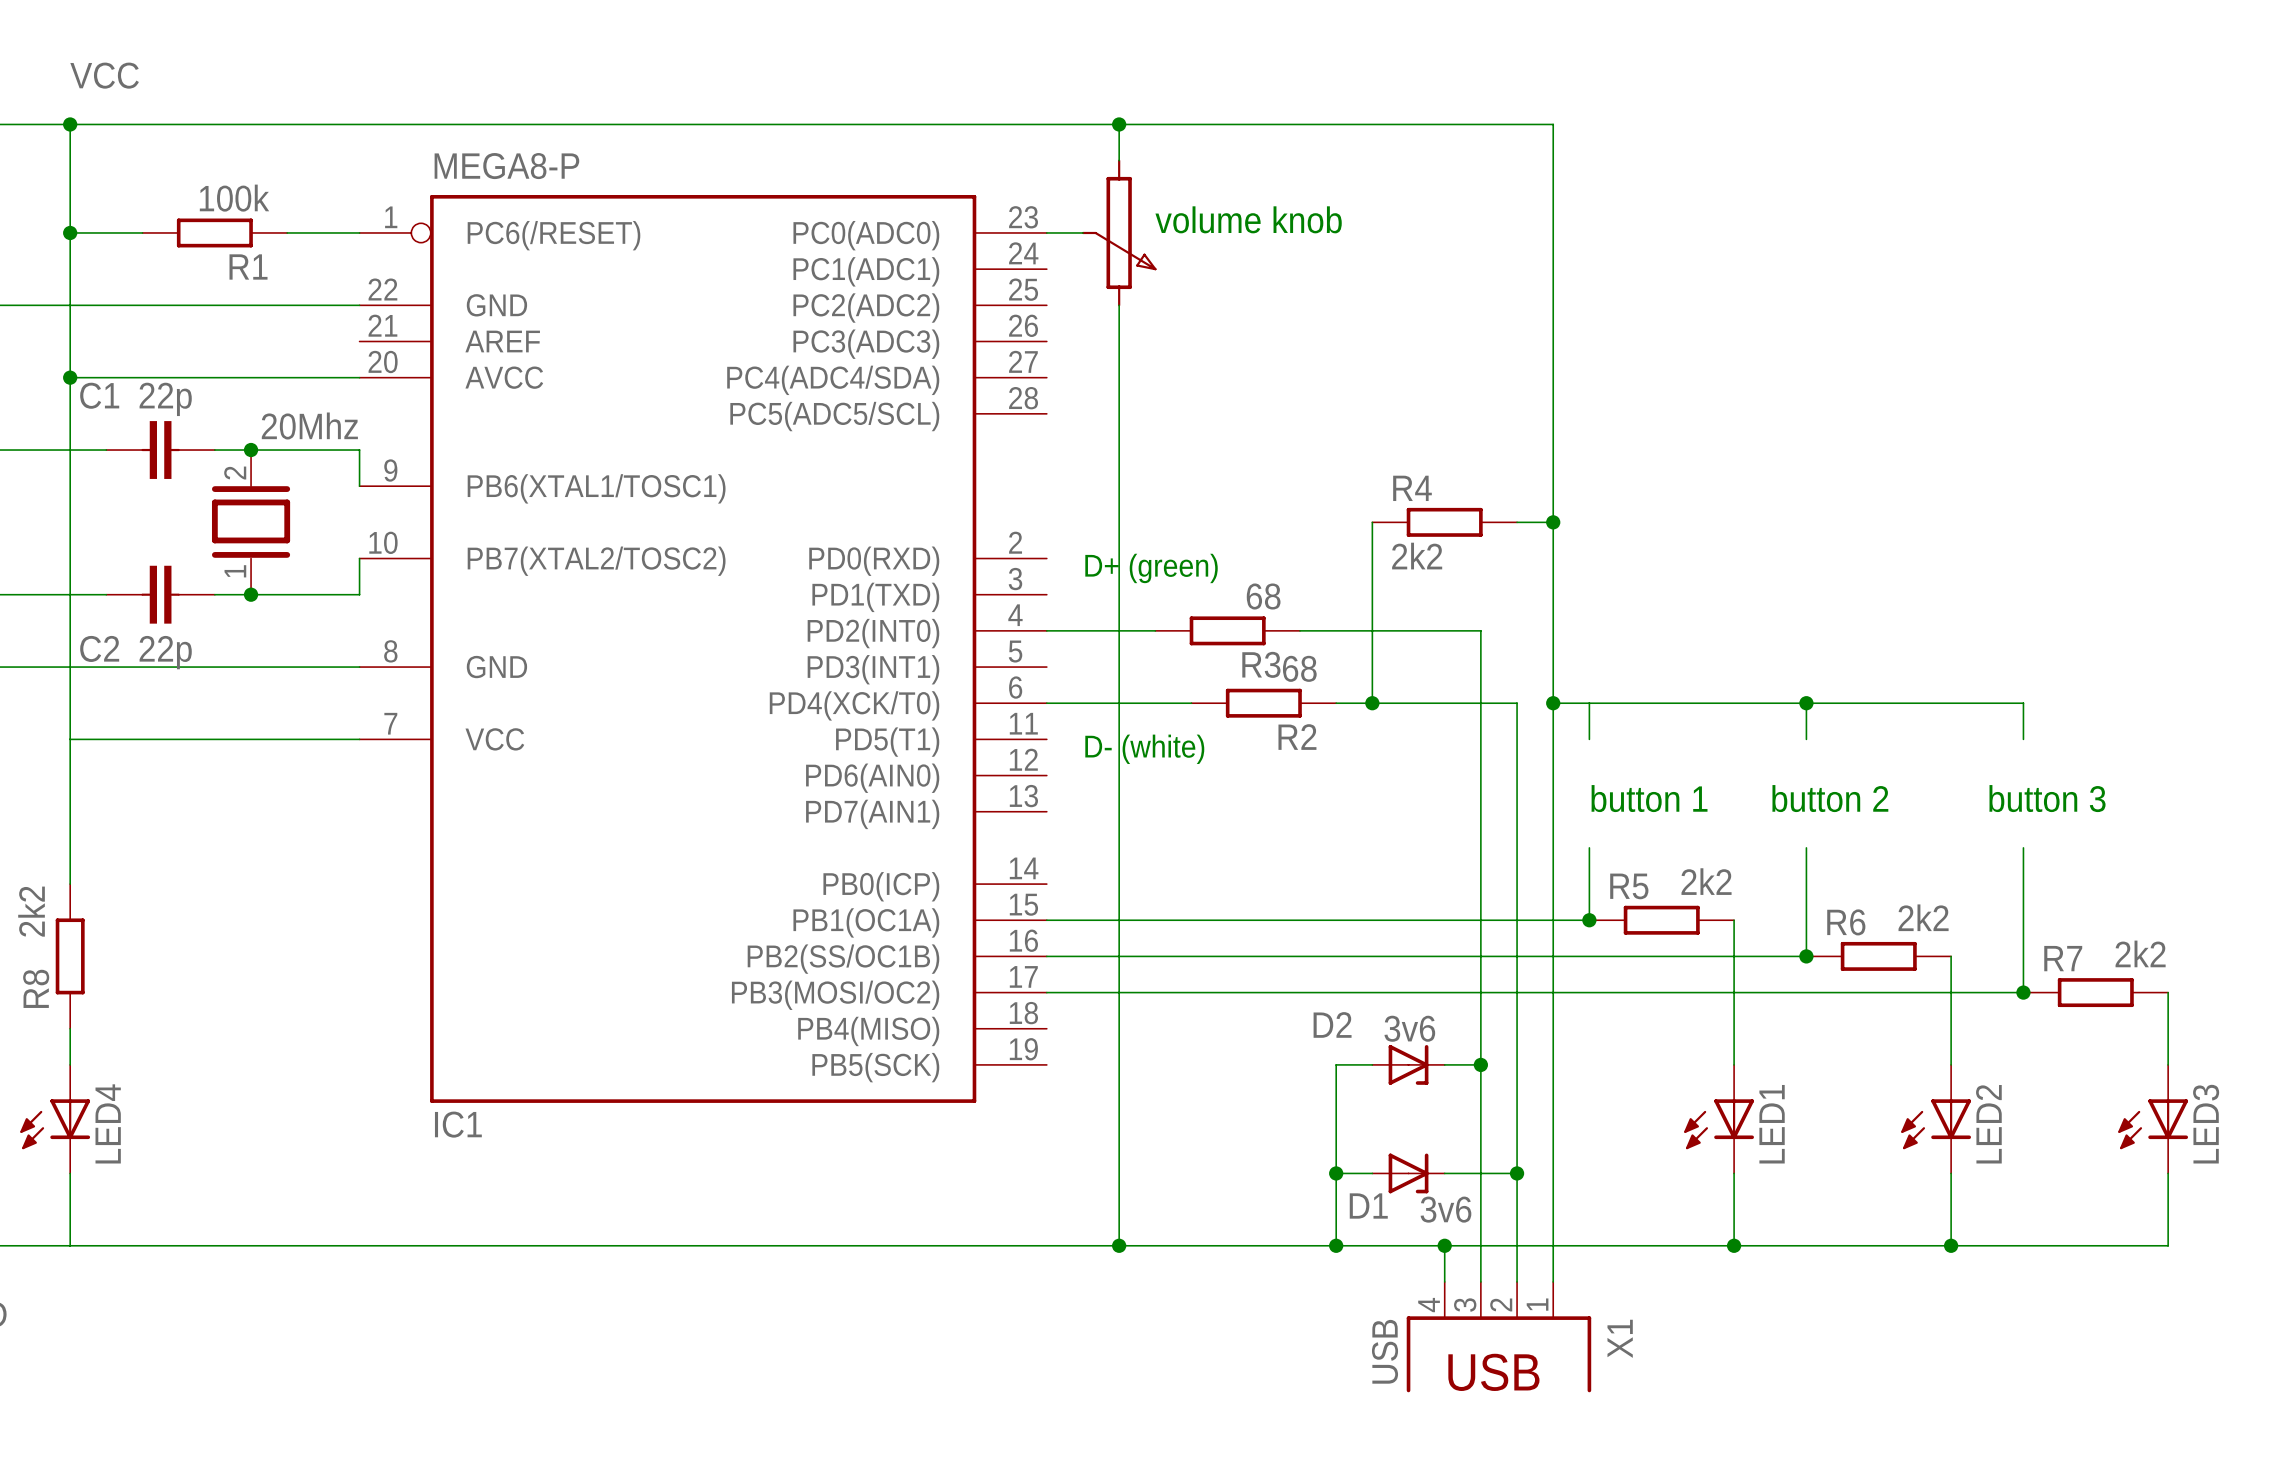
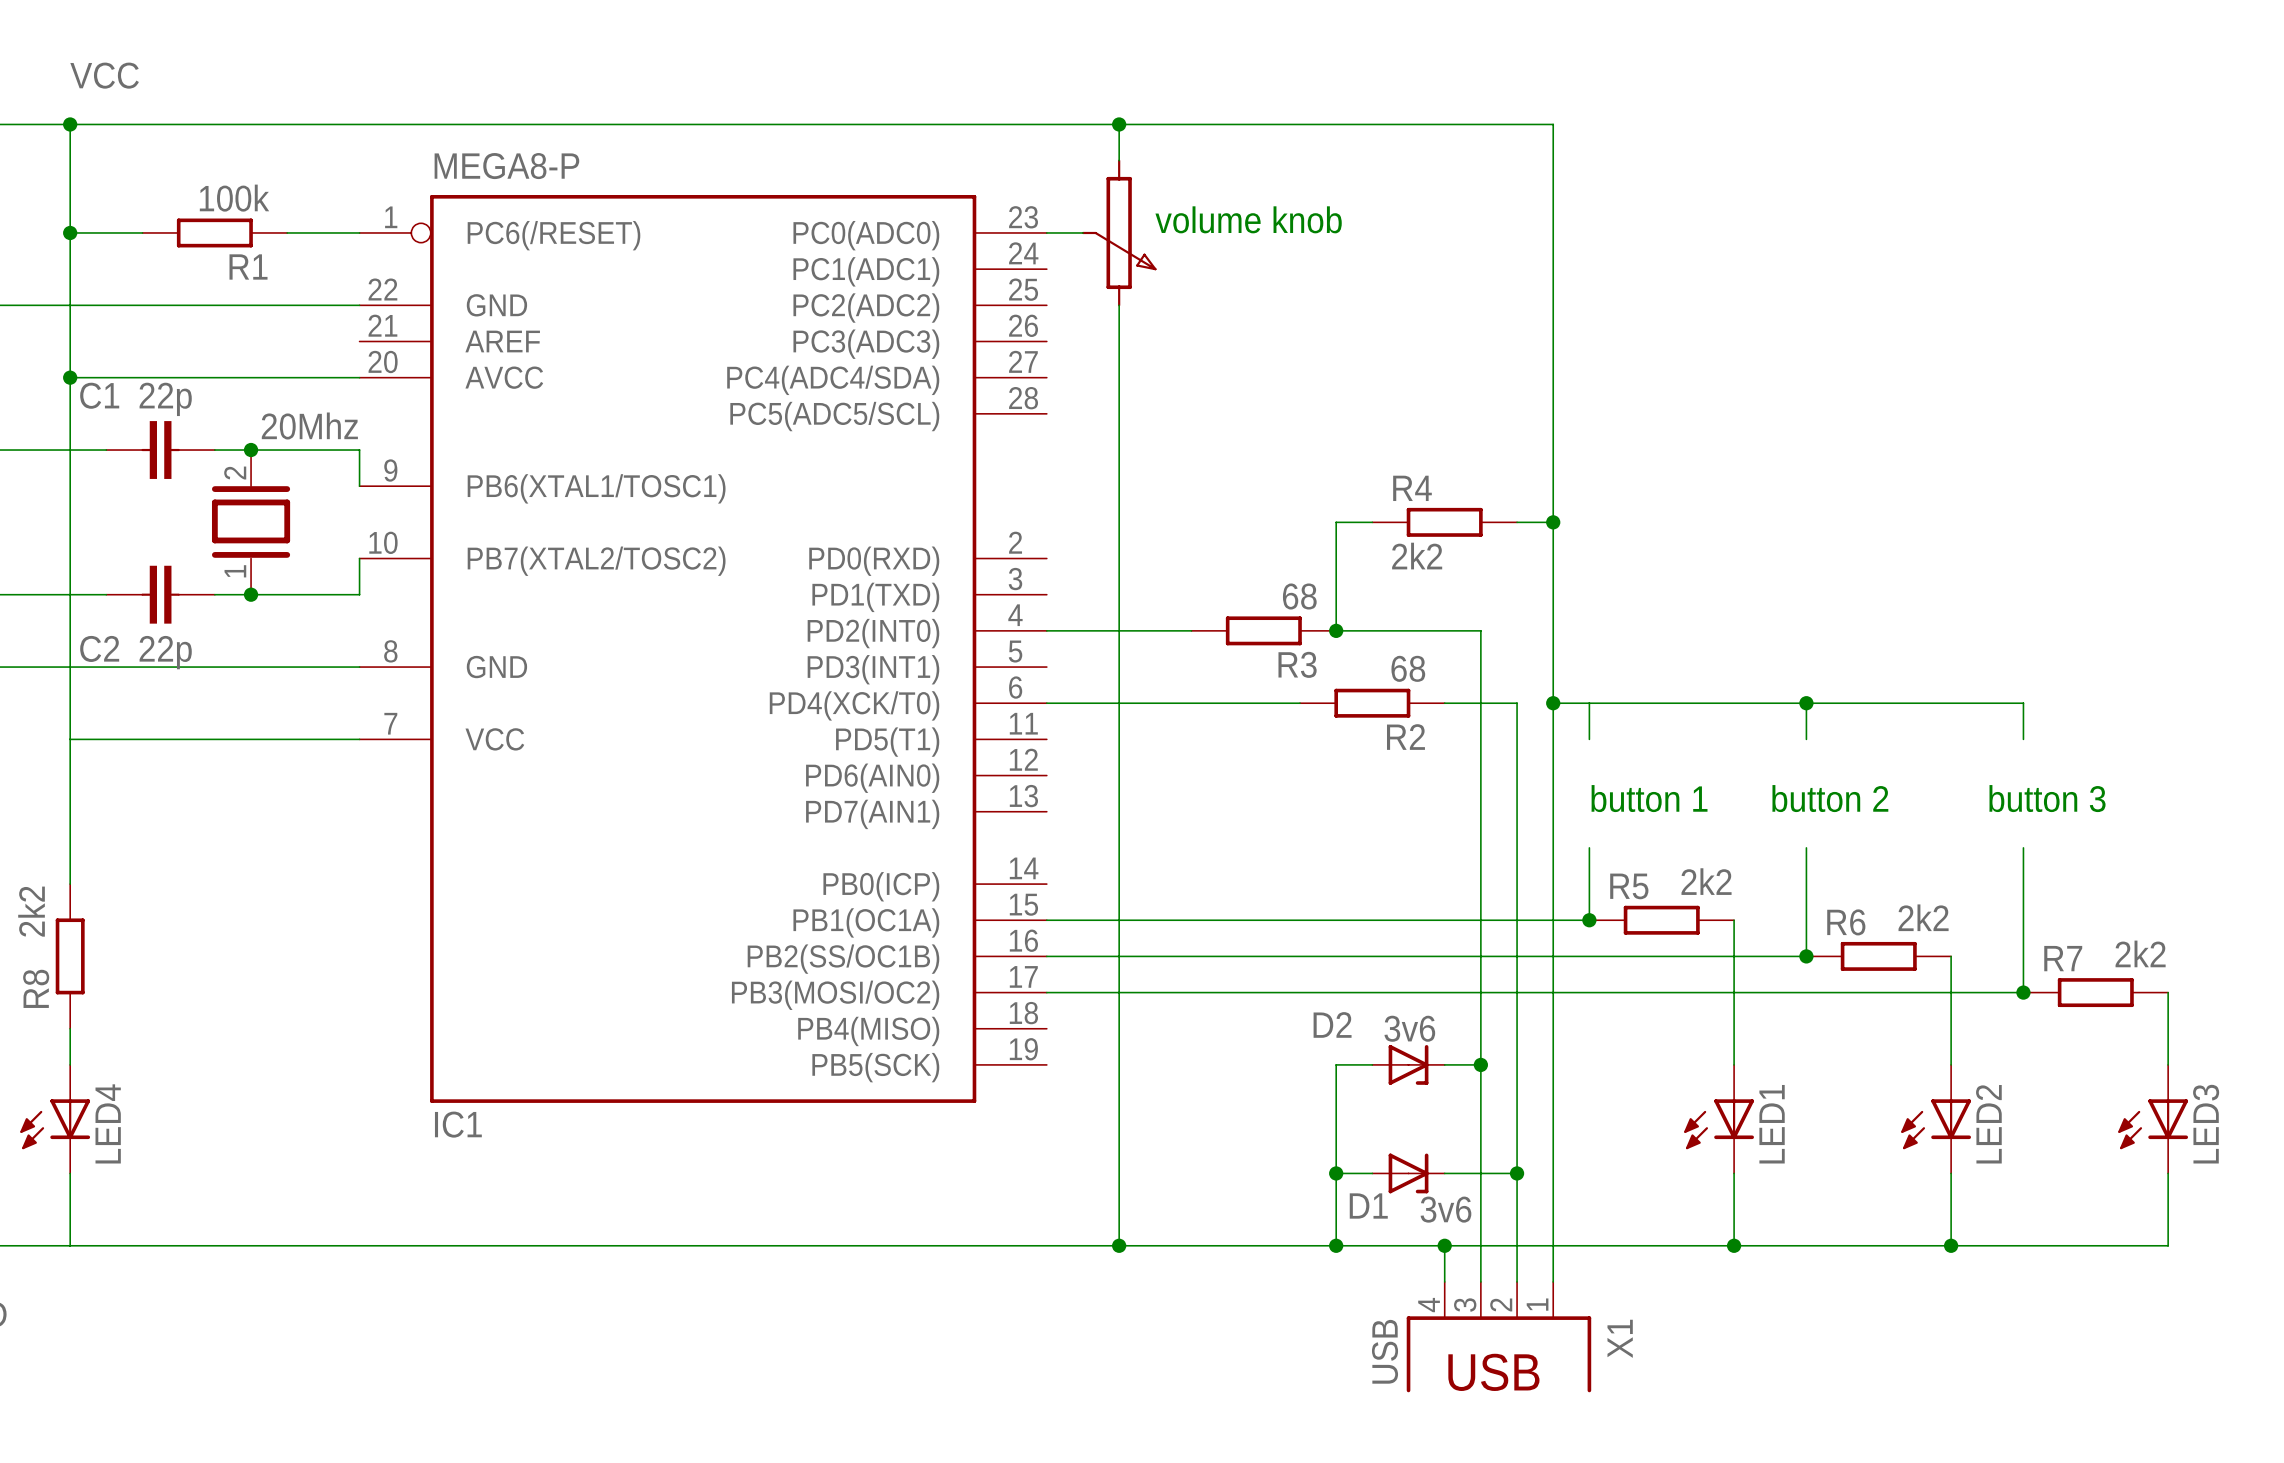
wire: (1372, 522) (1372, 703) -> (1372, 522) (1336, 522) (1336, 630)
text: D+ (green) (1151, 568) -> none
R3 position: (1227, 630) -> (1263, 630)
R2 position: (1263, 703) -> (1372, 703)
wire: (1336, 703) (1444, 703) -> (1191, 703) (1300, 703)
junction position: (1372, 703) -> (1336, 630)
text: D- (white) (1144, 749) -> none

